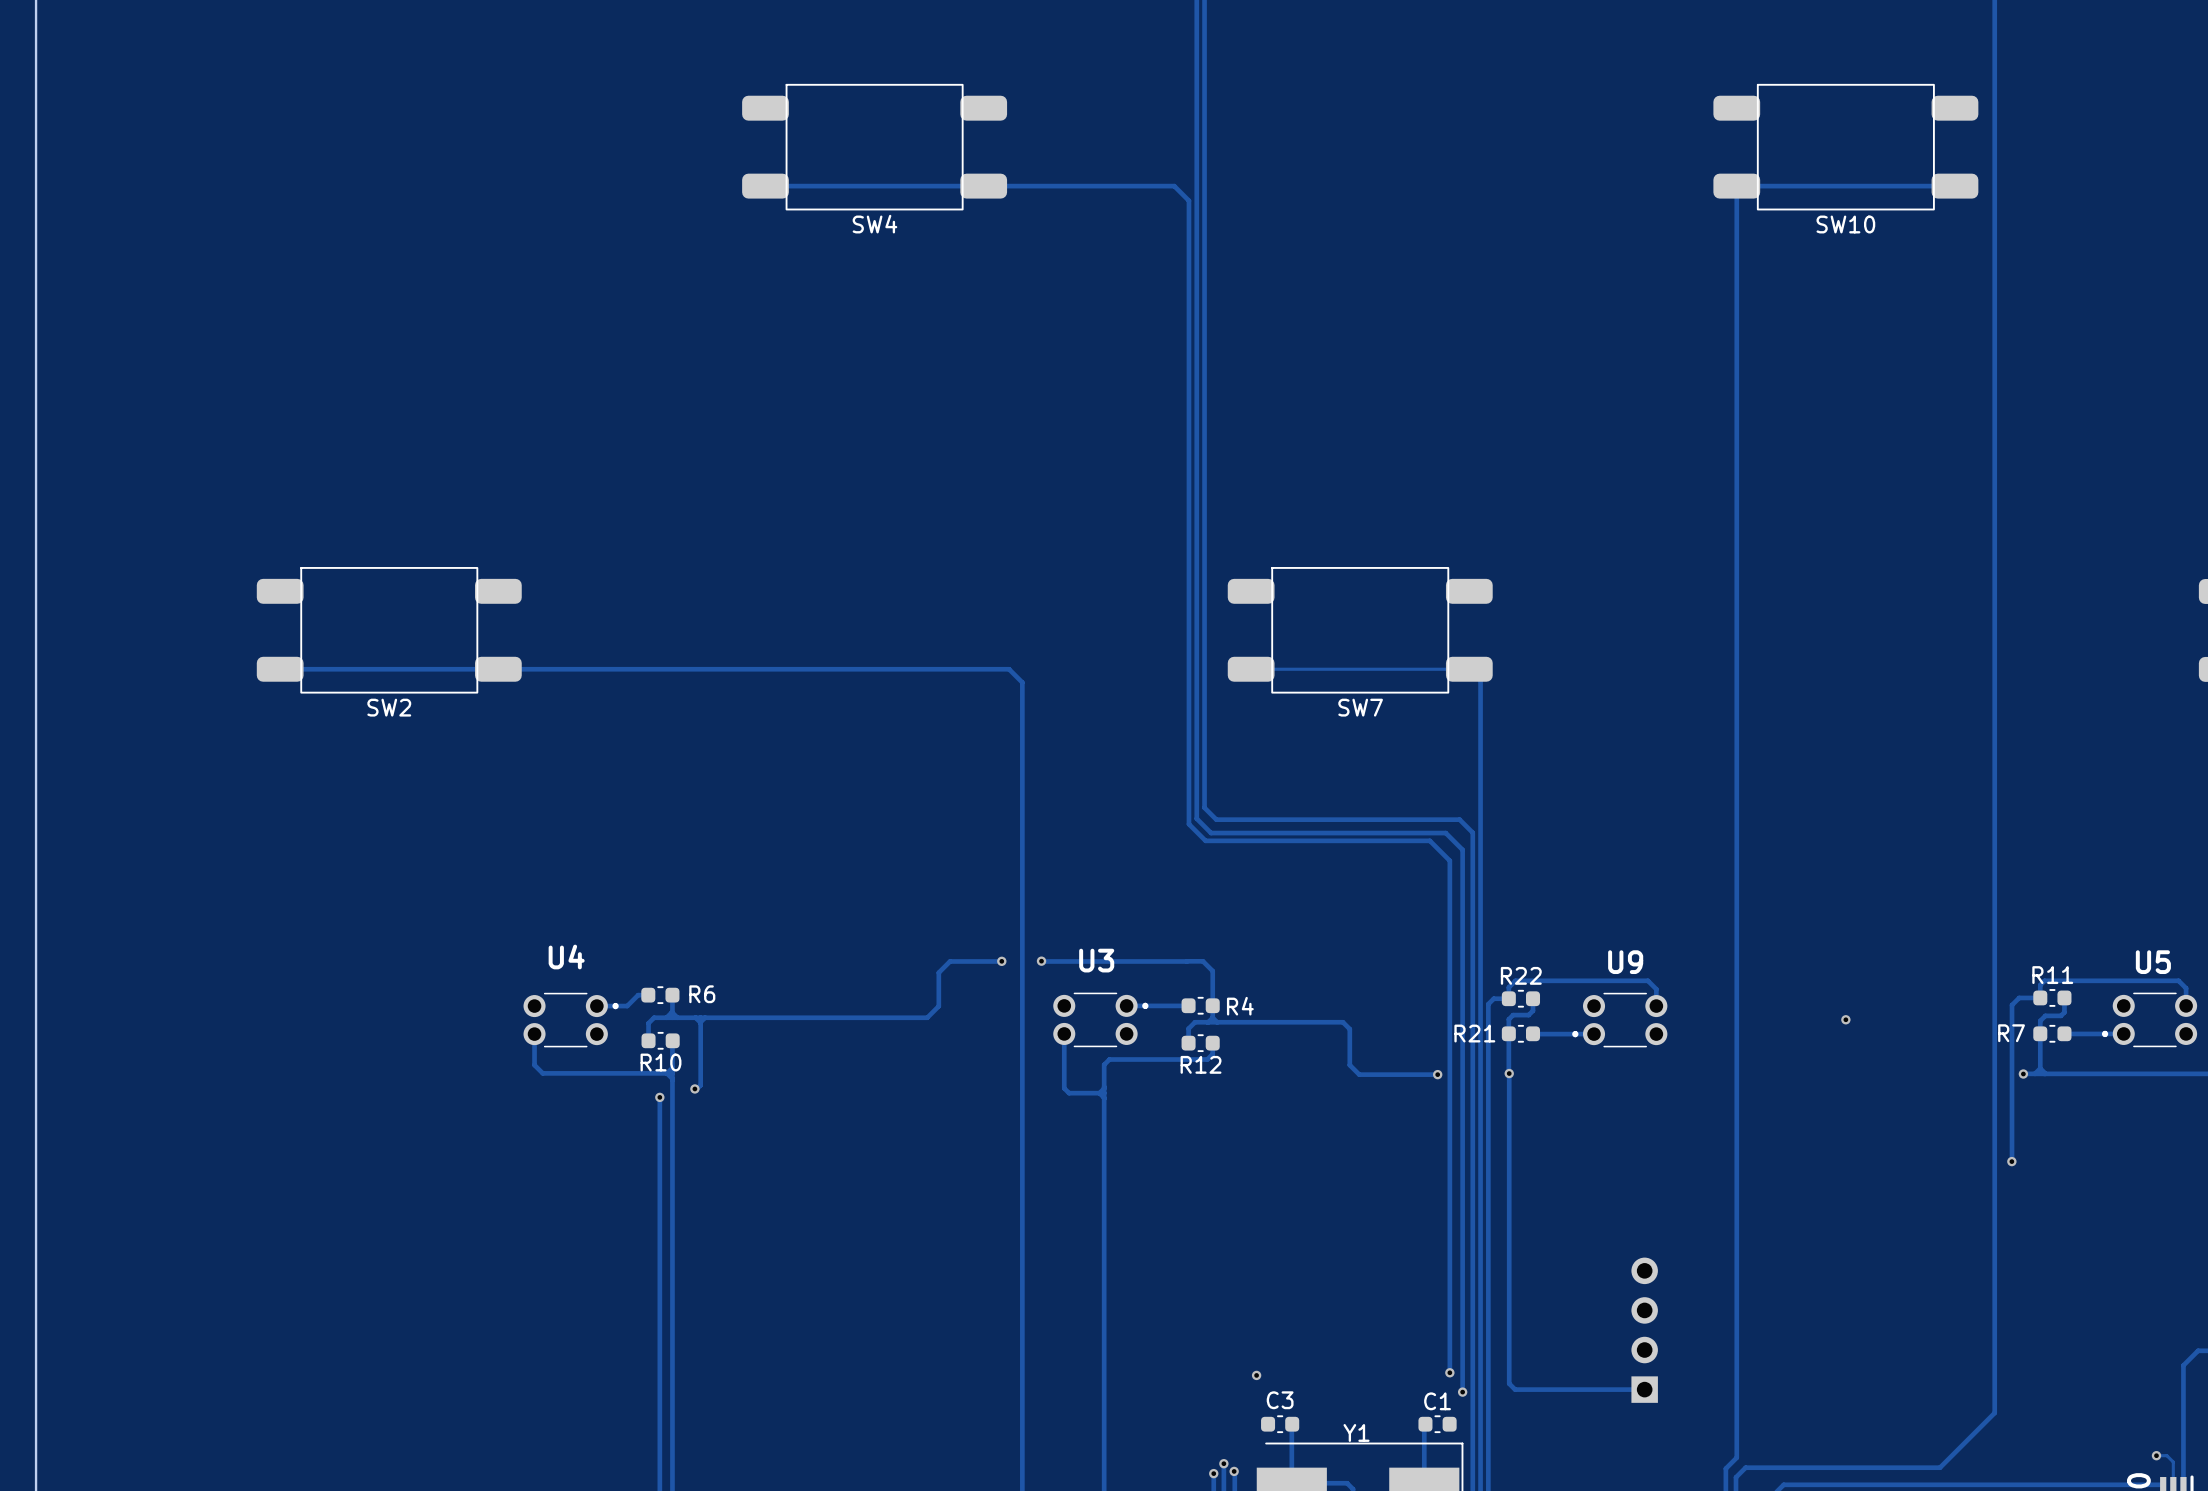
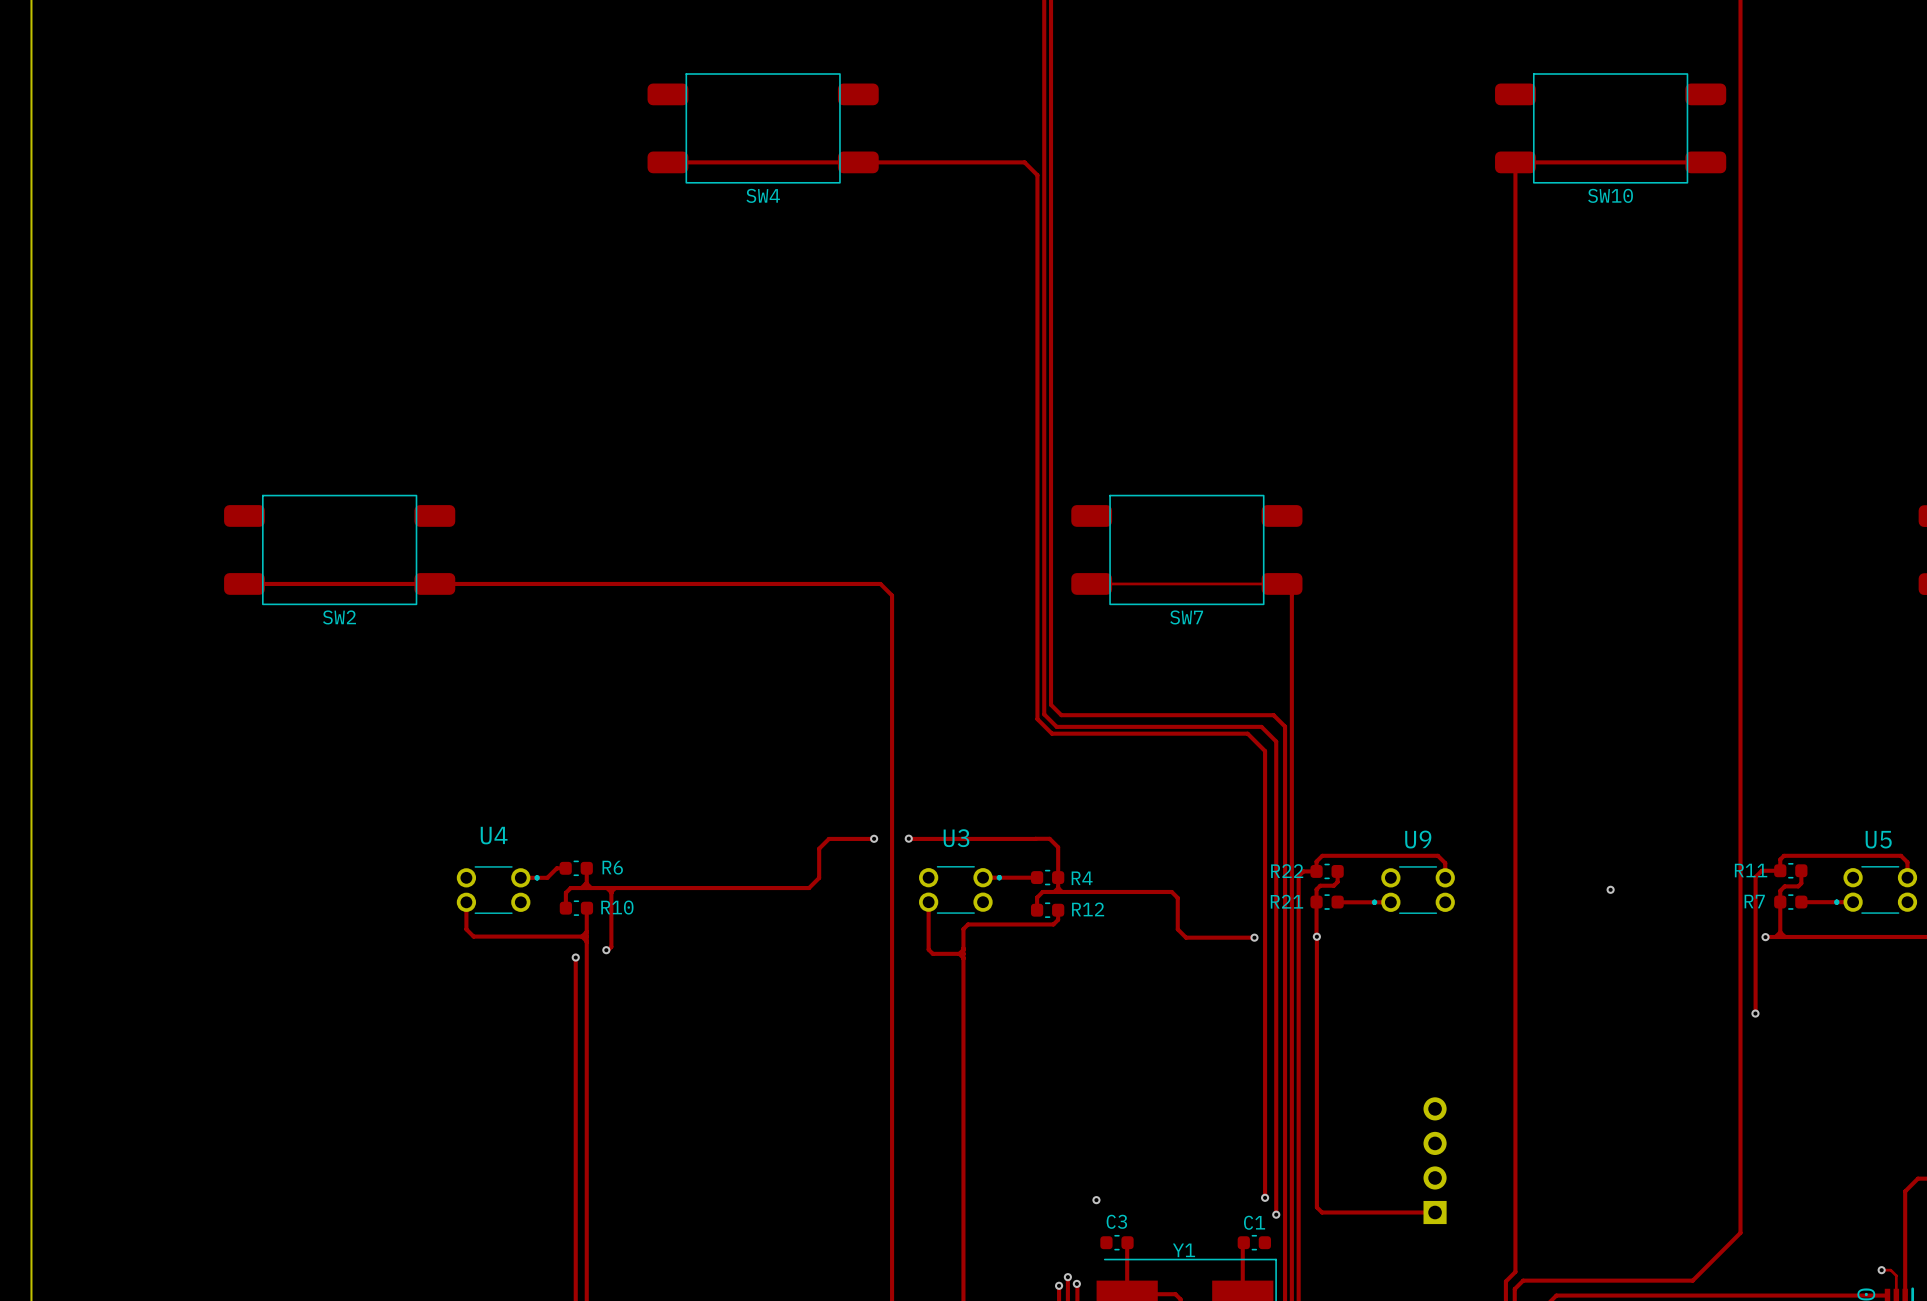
R22 name position: R22 (1521, 975) -> R22 (1287, 871)
R11 name position: R11 (2052, 975) -> R11 (1751, 870)
R10 name position: R10 (660, 1062) -> R10 (617, 907)
R12 name position: R12 (1201, 1064) -> R12 (1088, 909)

